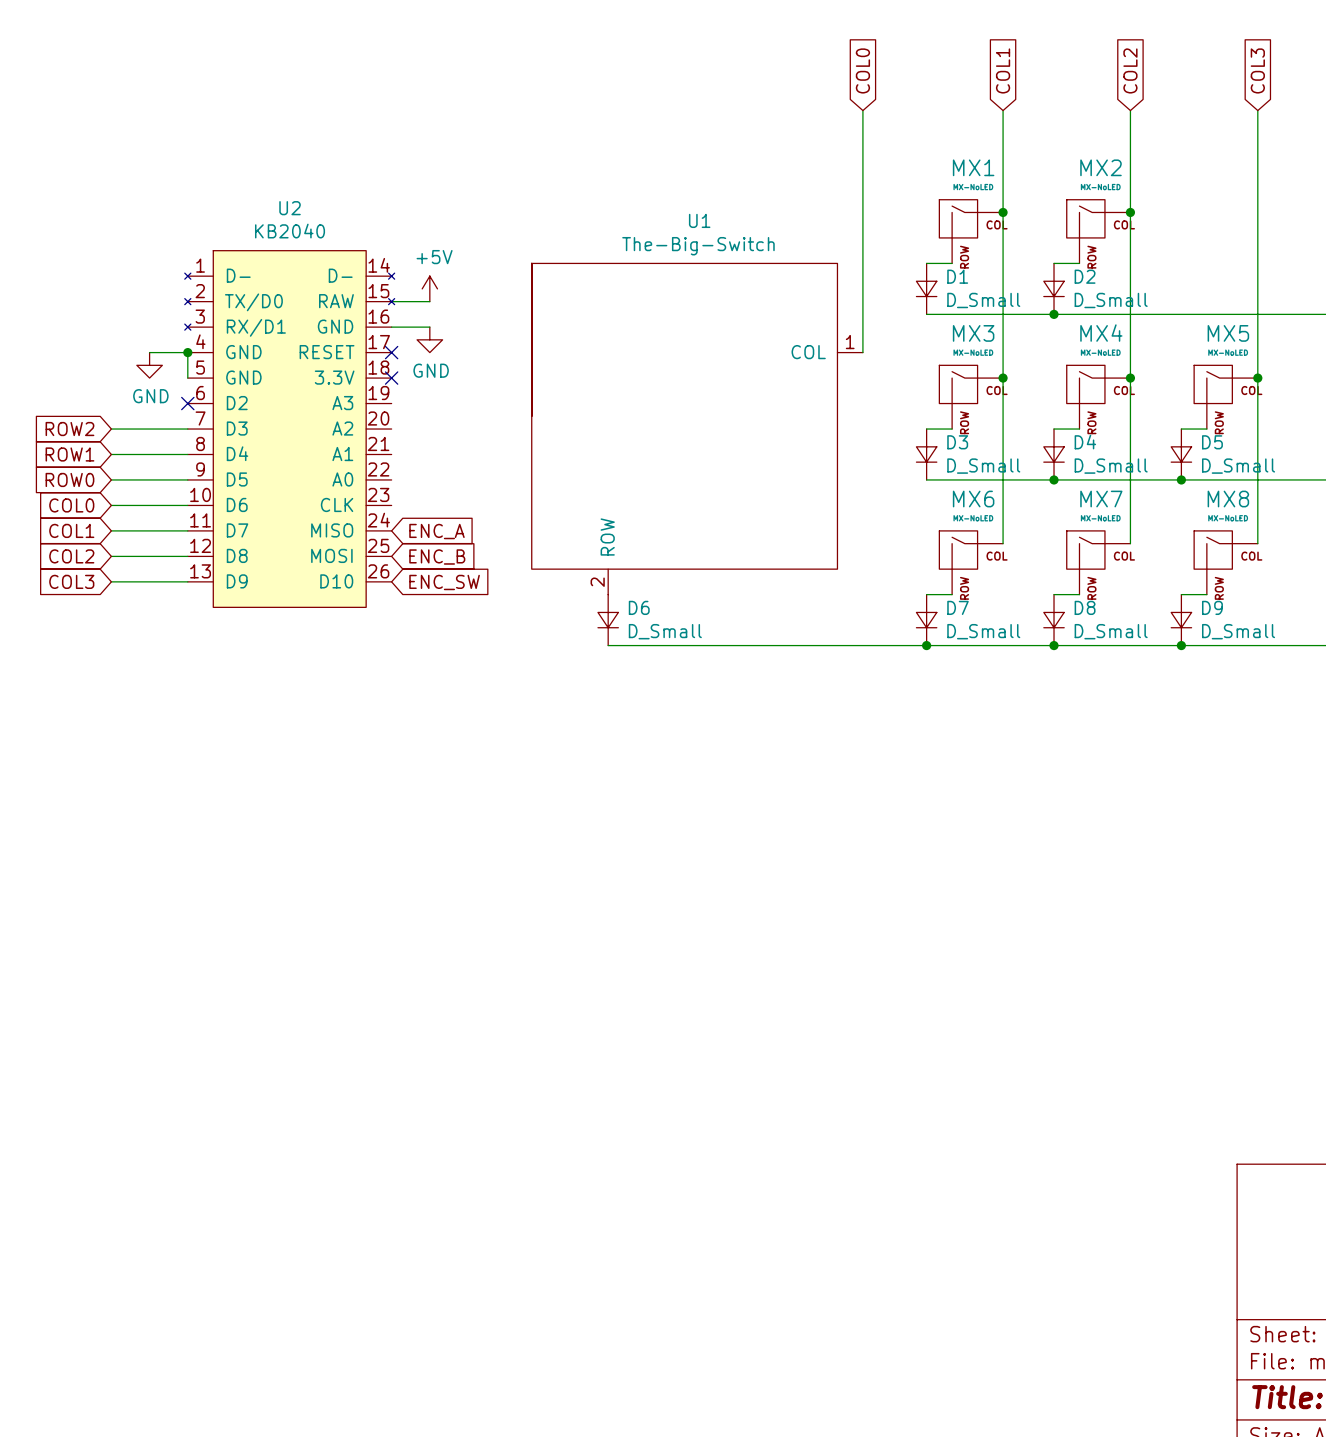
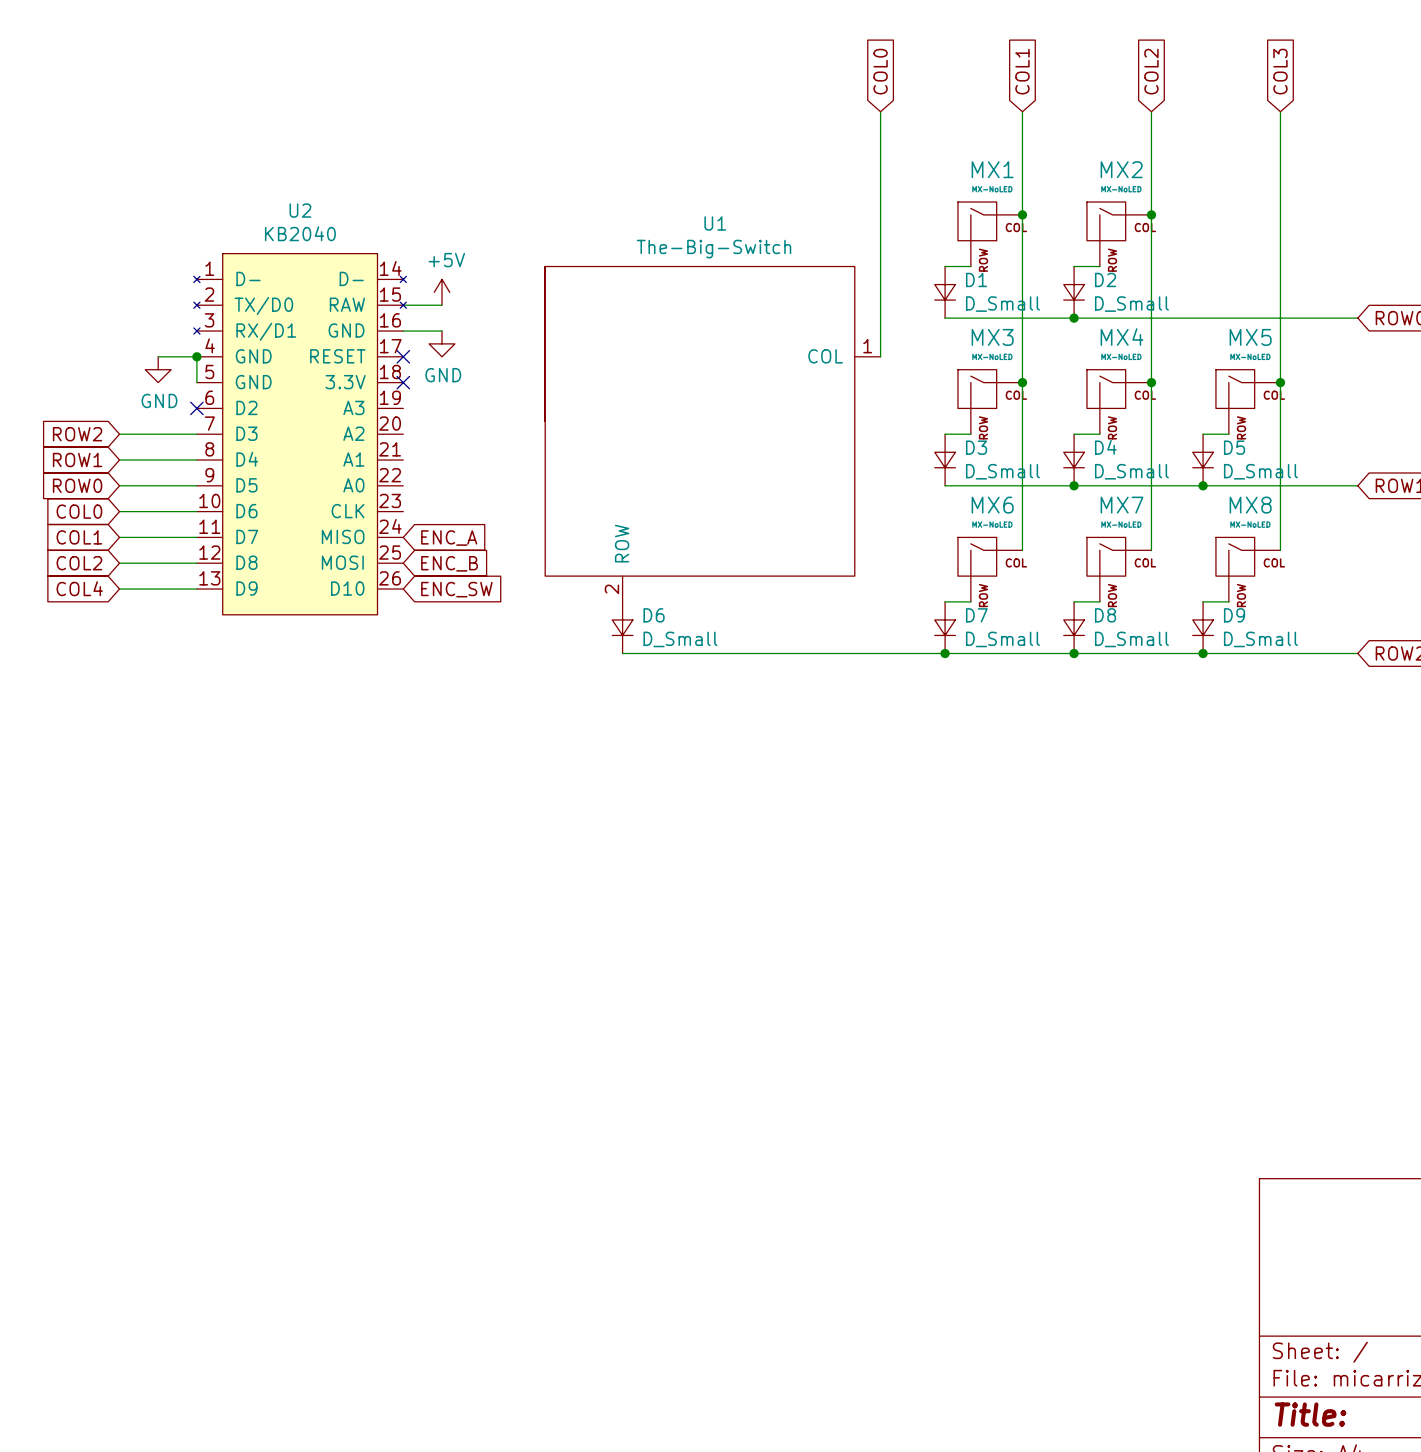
global label: COL3 (71, 581) -> COL4 (79, 588)

